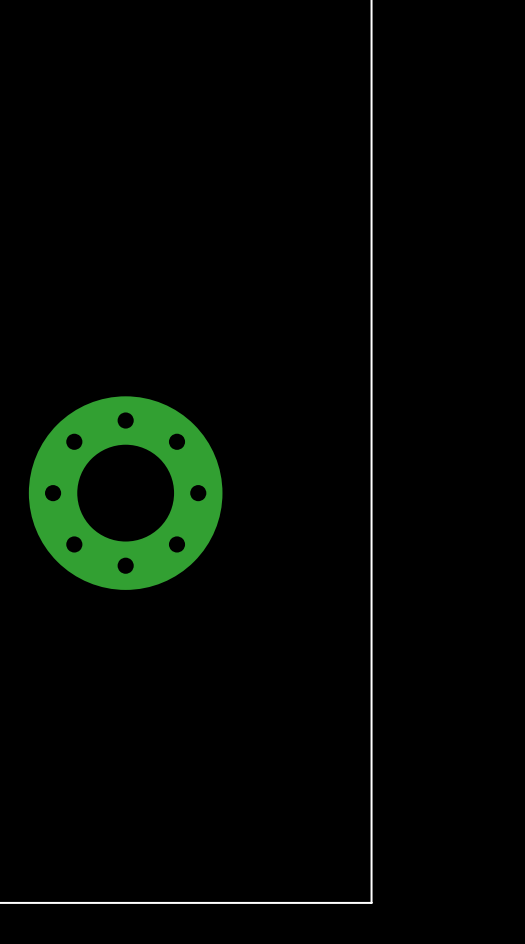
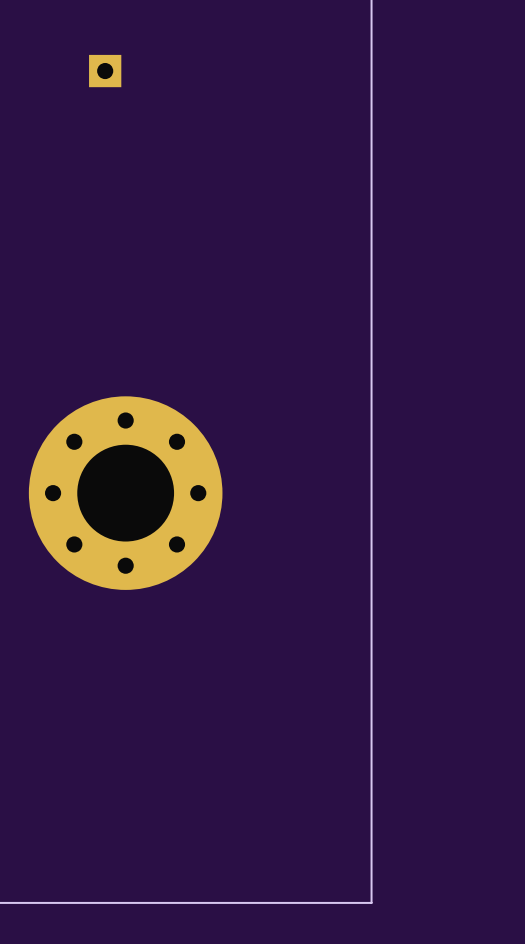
part: none -> (105, 71)

